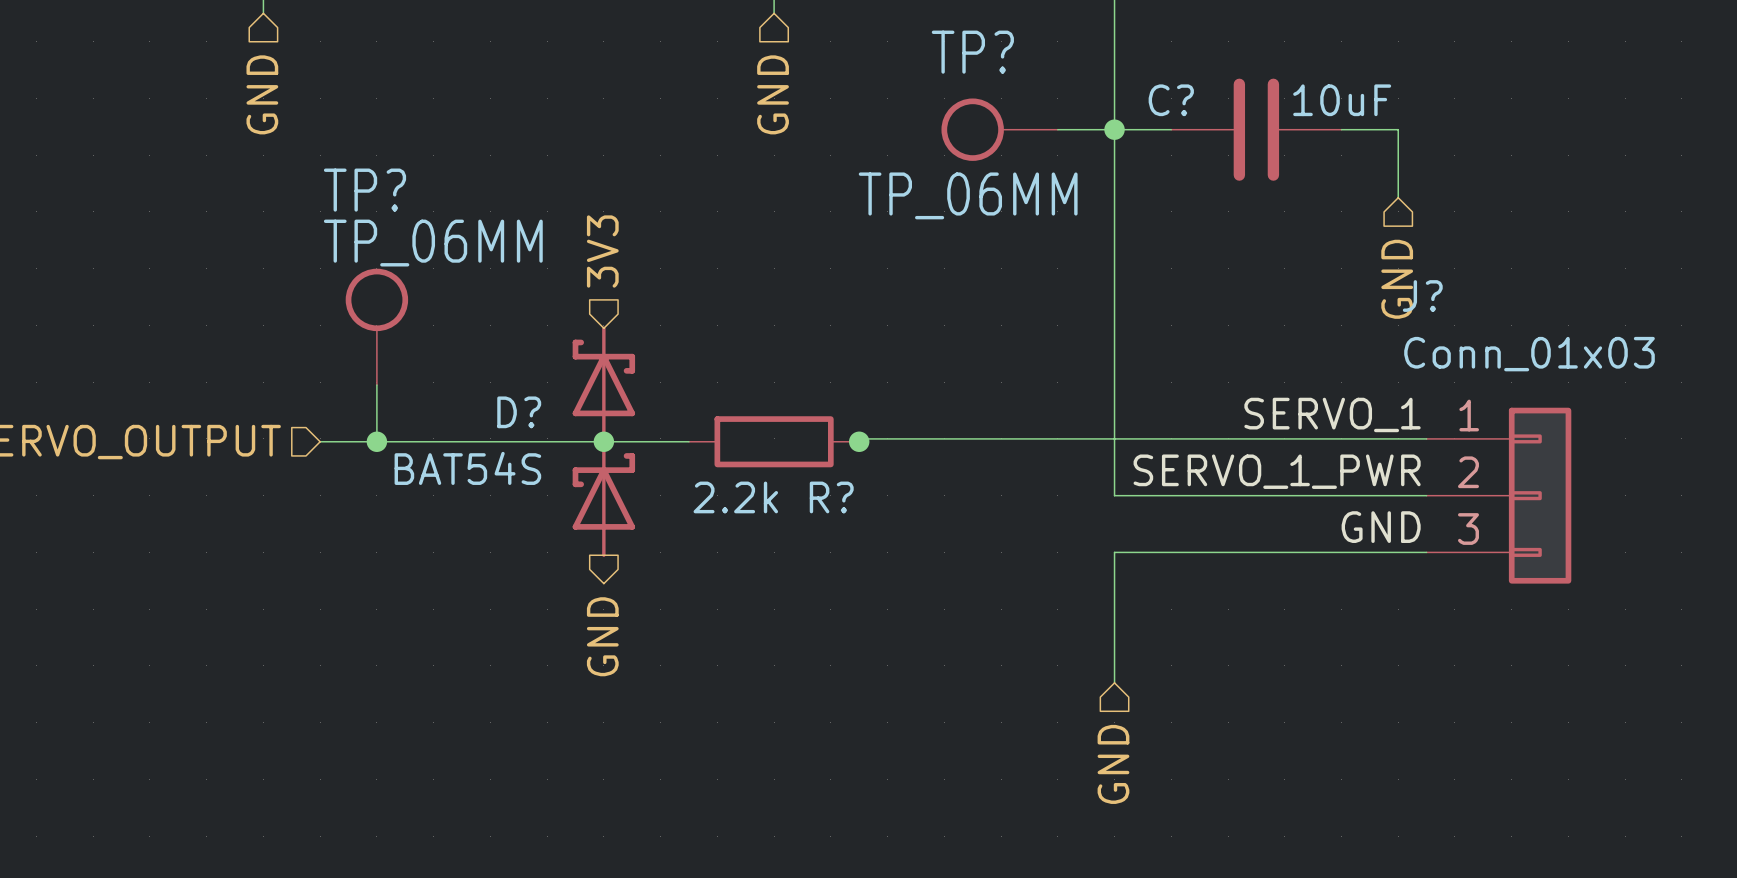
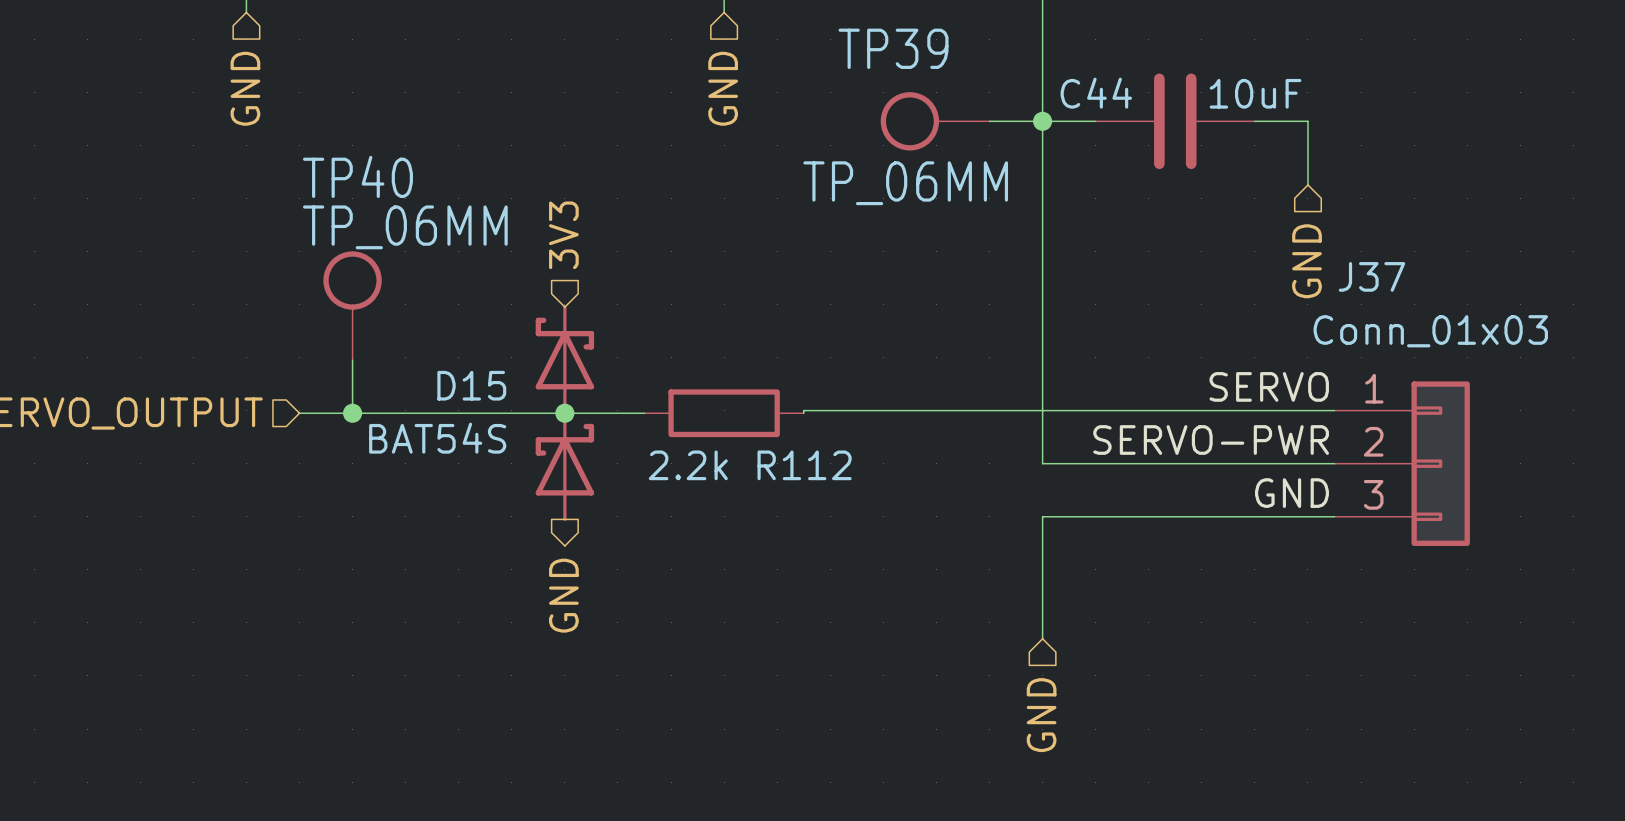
TP? name: TP? (972, 52) -> TP39 (893, 48)
C? name: C? (1171, 100) -> C44 (1096, 93)
TP? name: TP? (365, 190) -> TP40 (357, 176)
J? name: J? (1422, 296) -> J37 (1372, 276)
D? name: D? (519, 412) -> D15 (471, 385)
label: SERVO_1 (1332, 414) -> SERVO (1269, 386)
junction: (859, 441) -> none
label: SERVO_1_PWR (1277, 471) -> SERVO-PWR (1211, 439)
R? name: R? (831, 497) -> R112 (804, 465)

